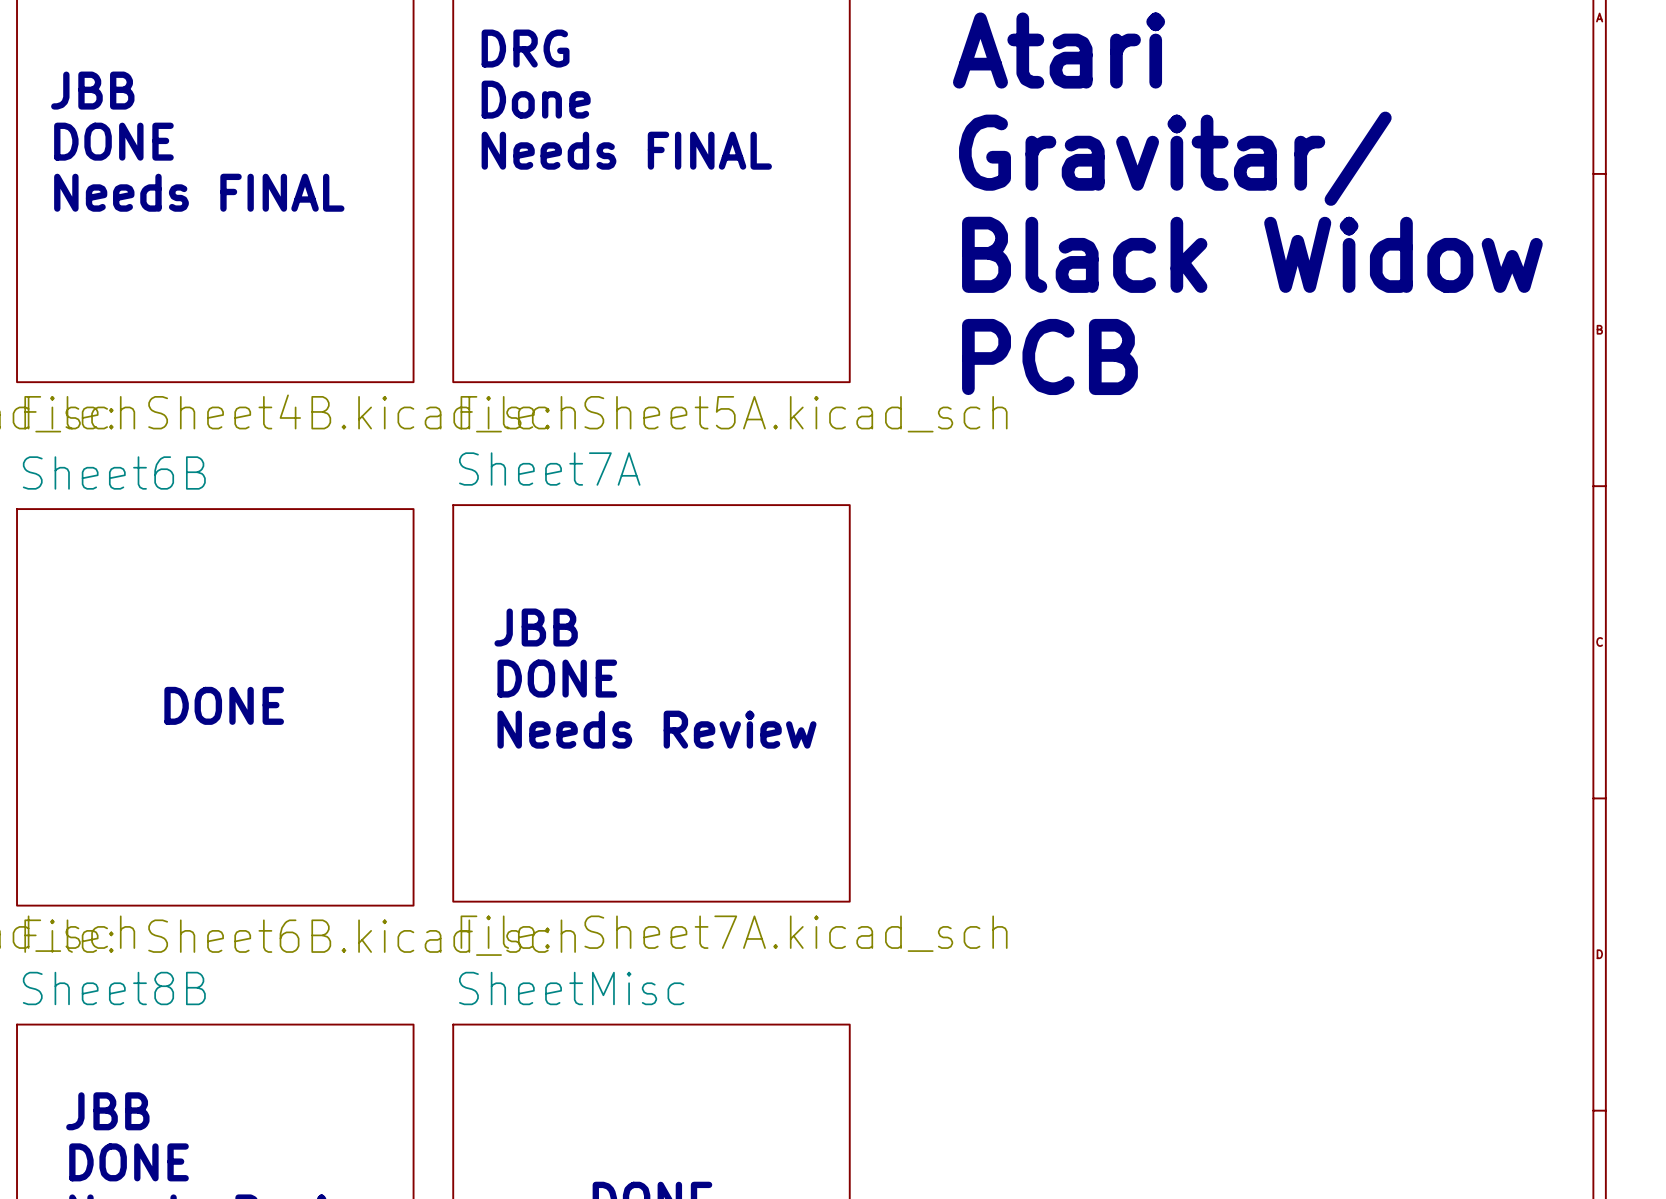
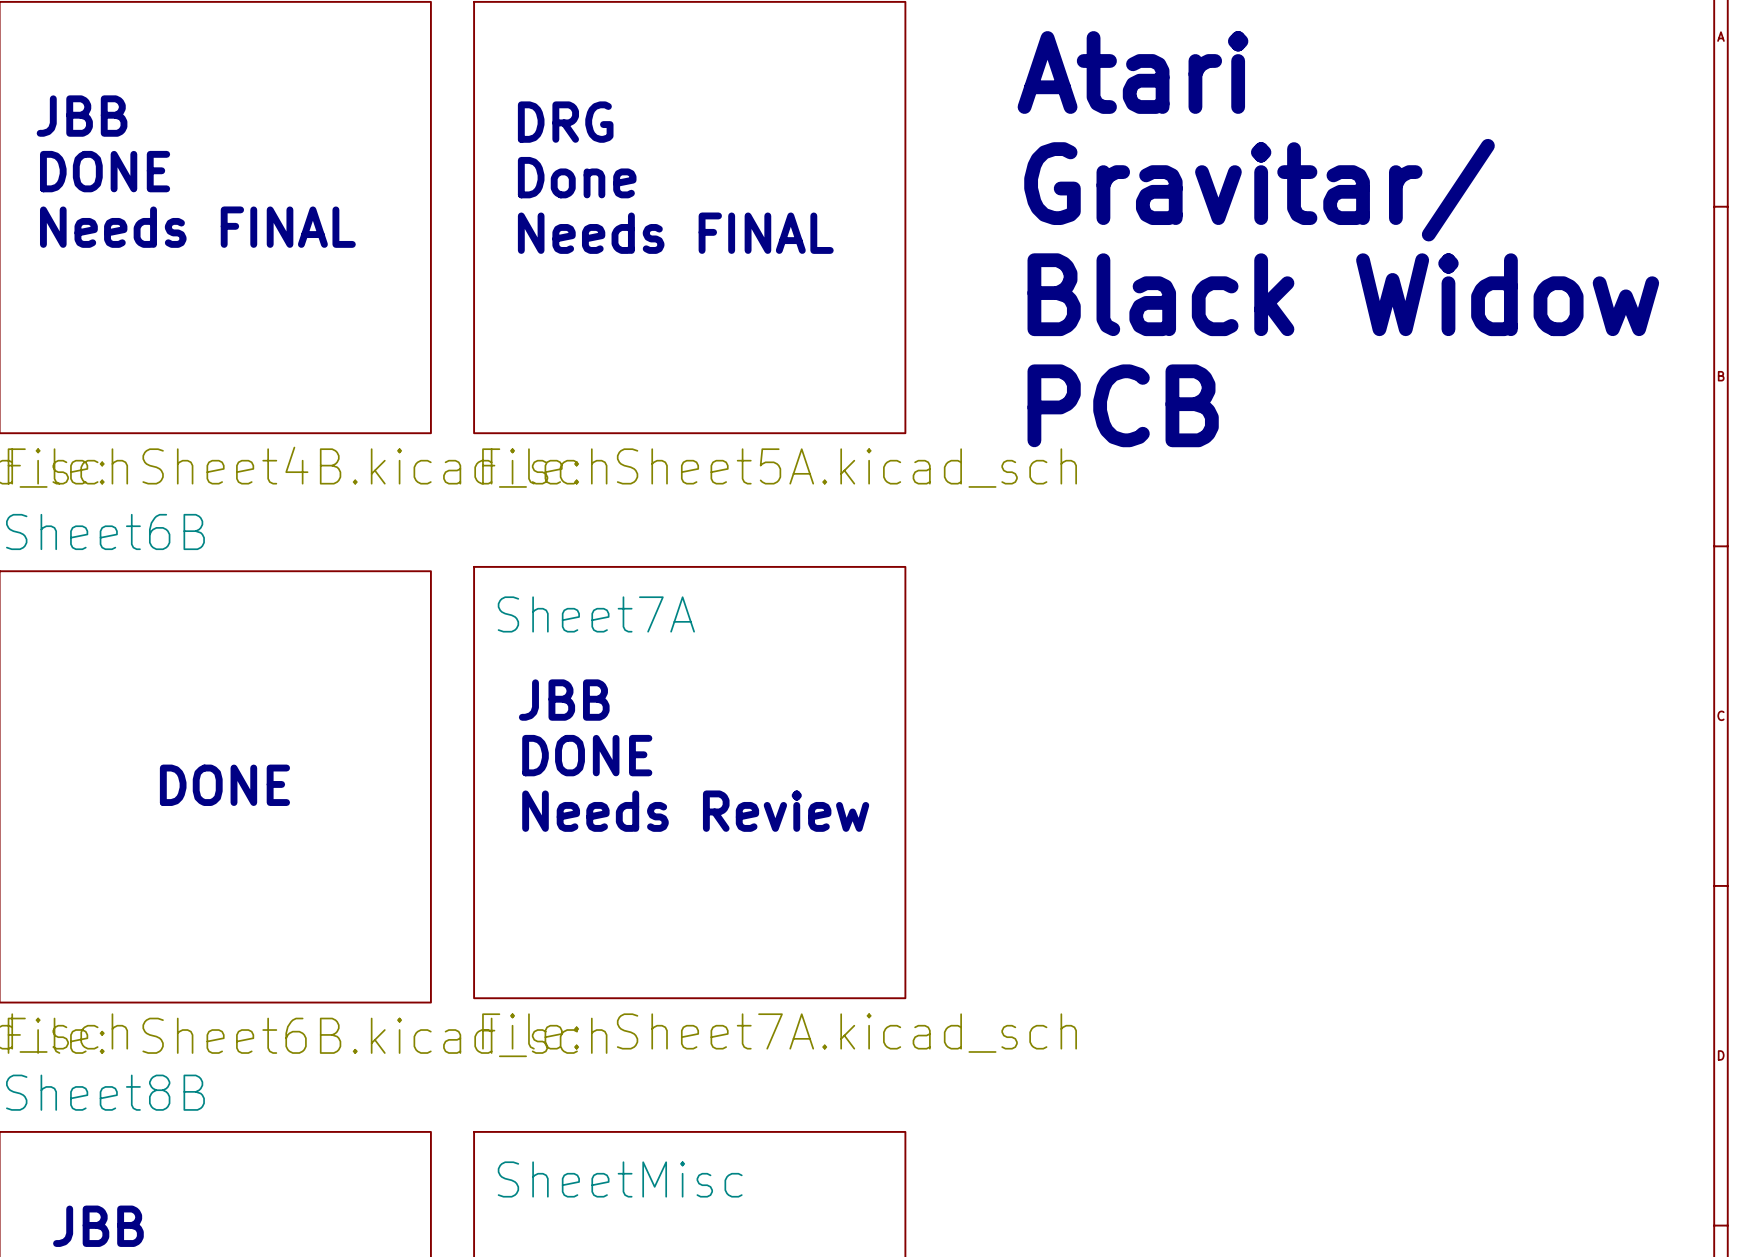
text position: DRG (525, 48) -> DRG (565, 122)
text position: Done (536, 99) -> Done (577, 177)
text position: Needs FINAL (626, 150) -> Needs FINAL (675, 233)
sheet Sheet7A name position: Sheet7A (549, 469) -> Sheet7A (596, 614)
sheet SheetMisc name position: SheetMisc (571, 988) -> SheetMisc (620, 1179)

